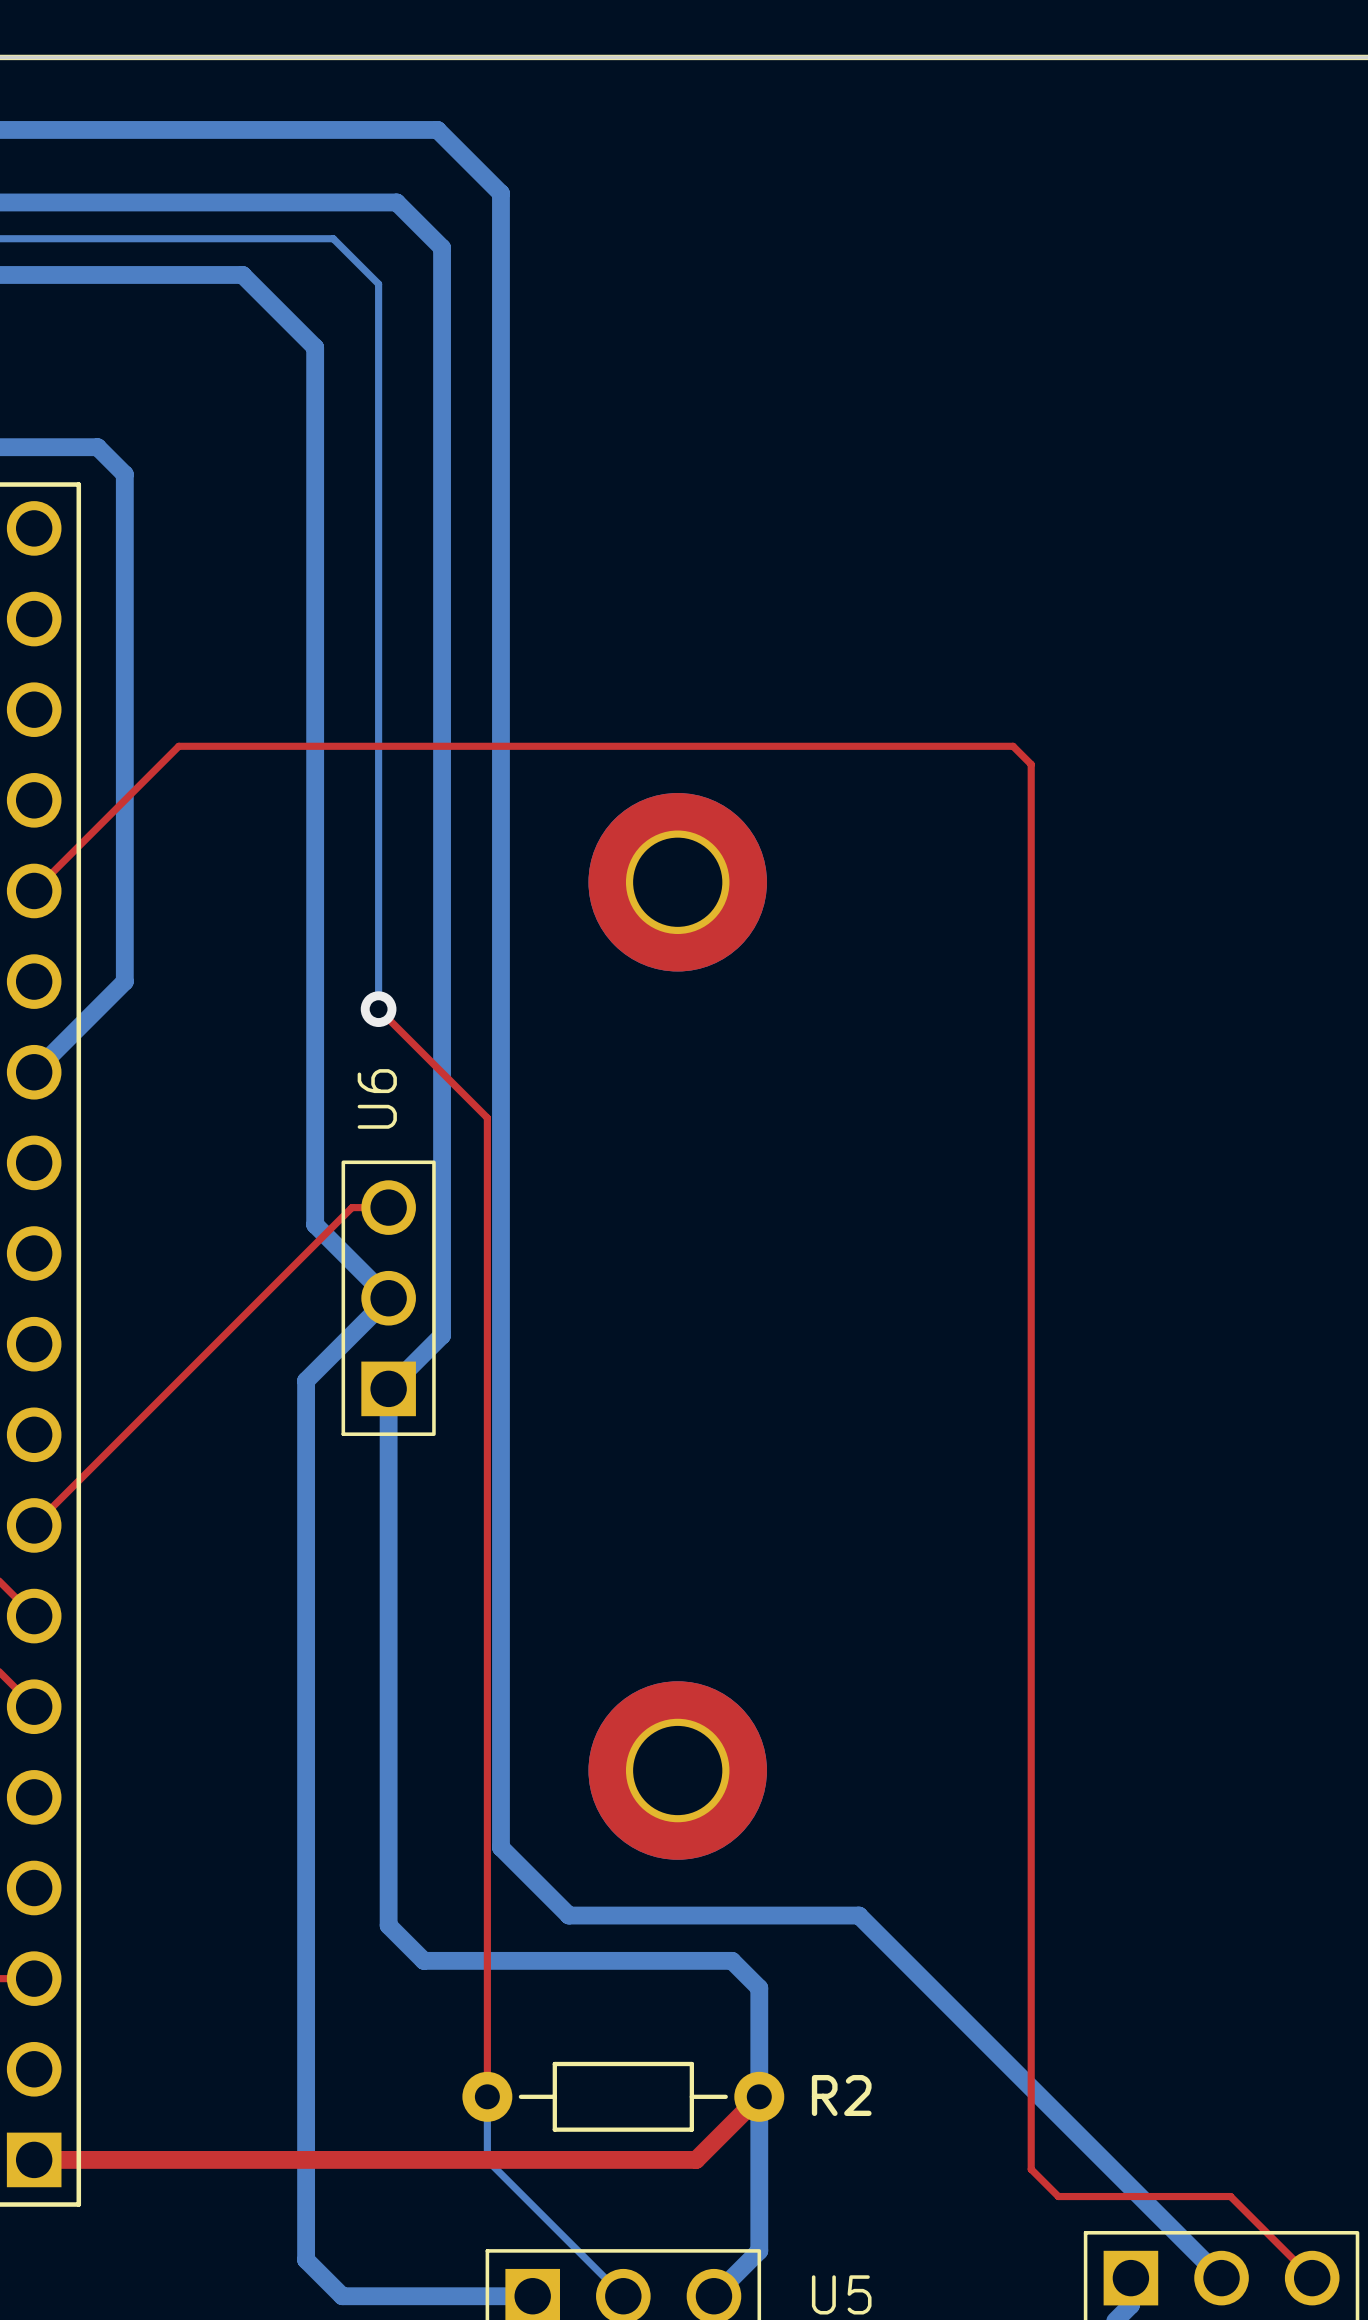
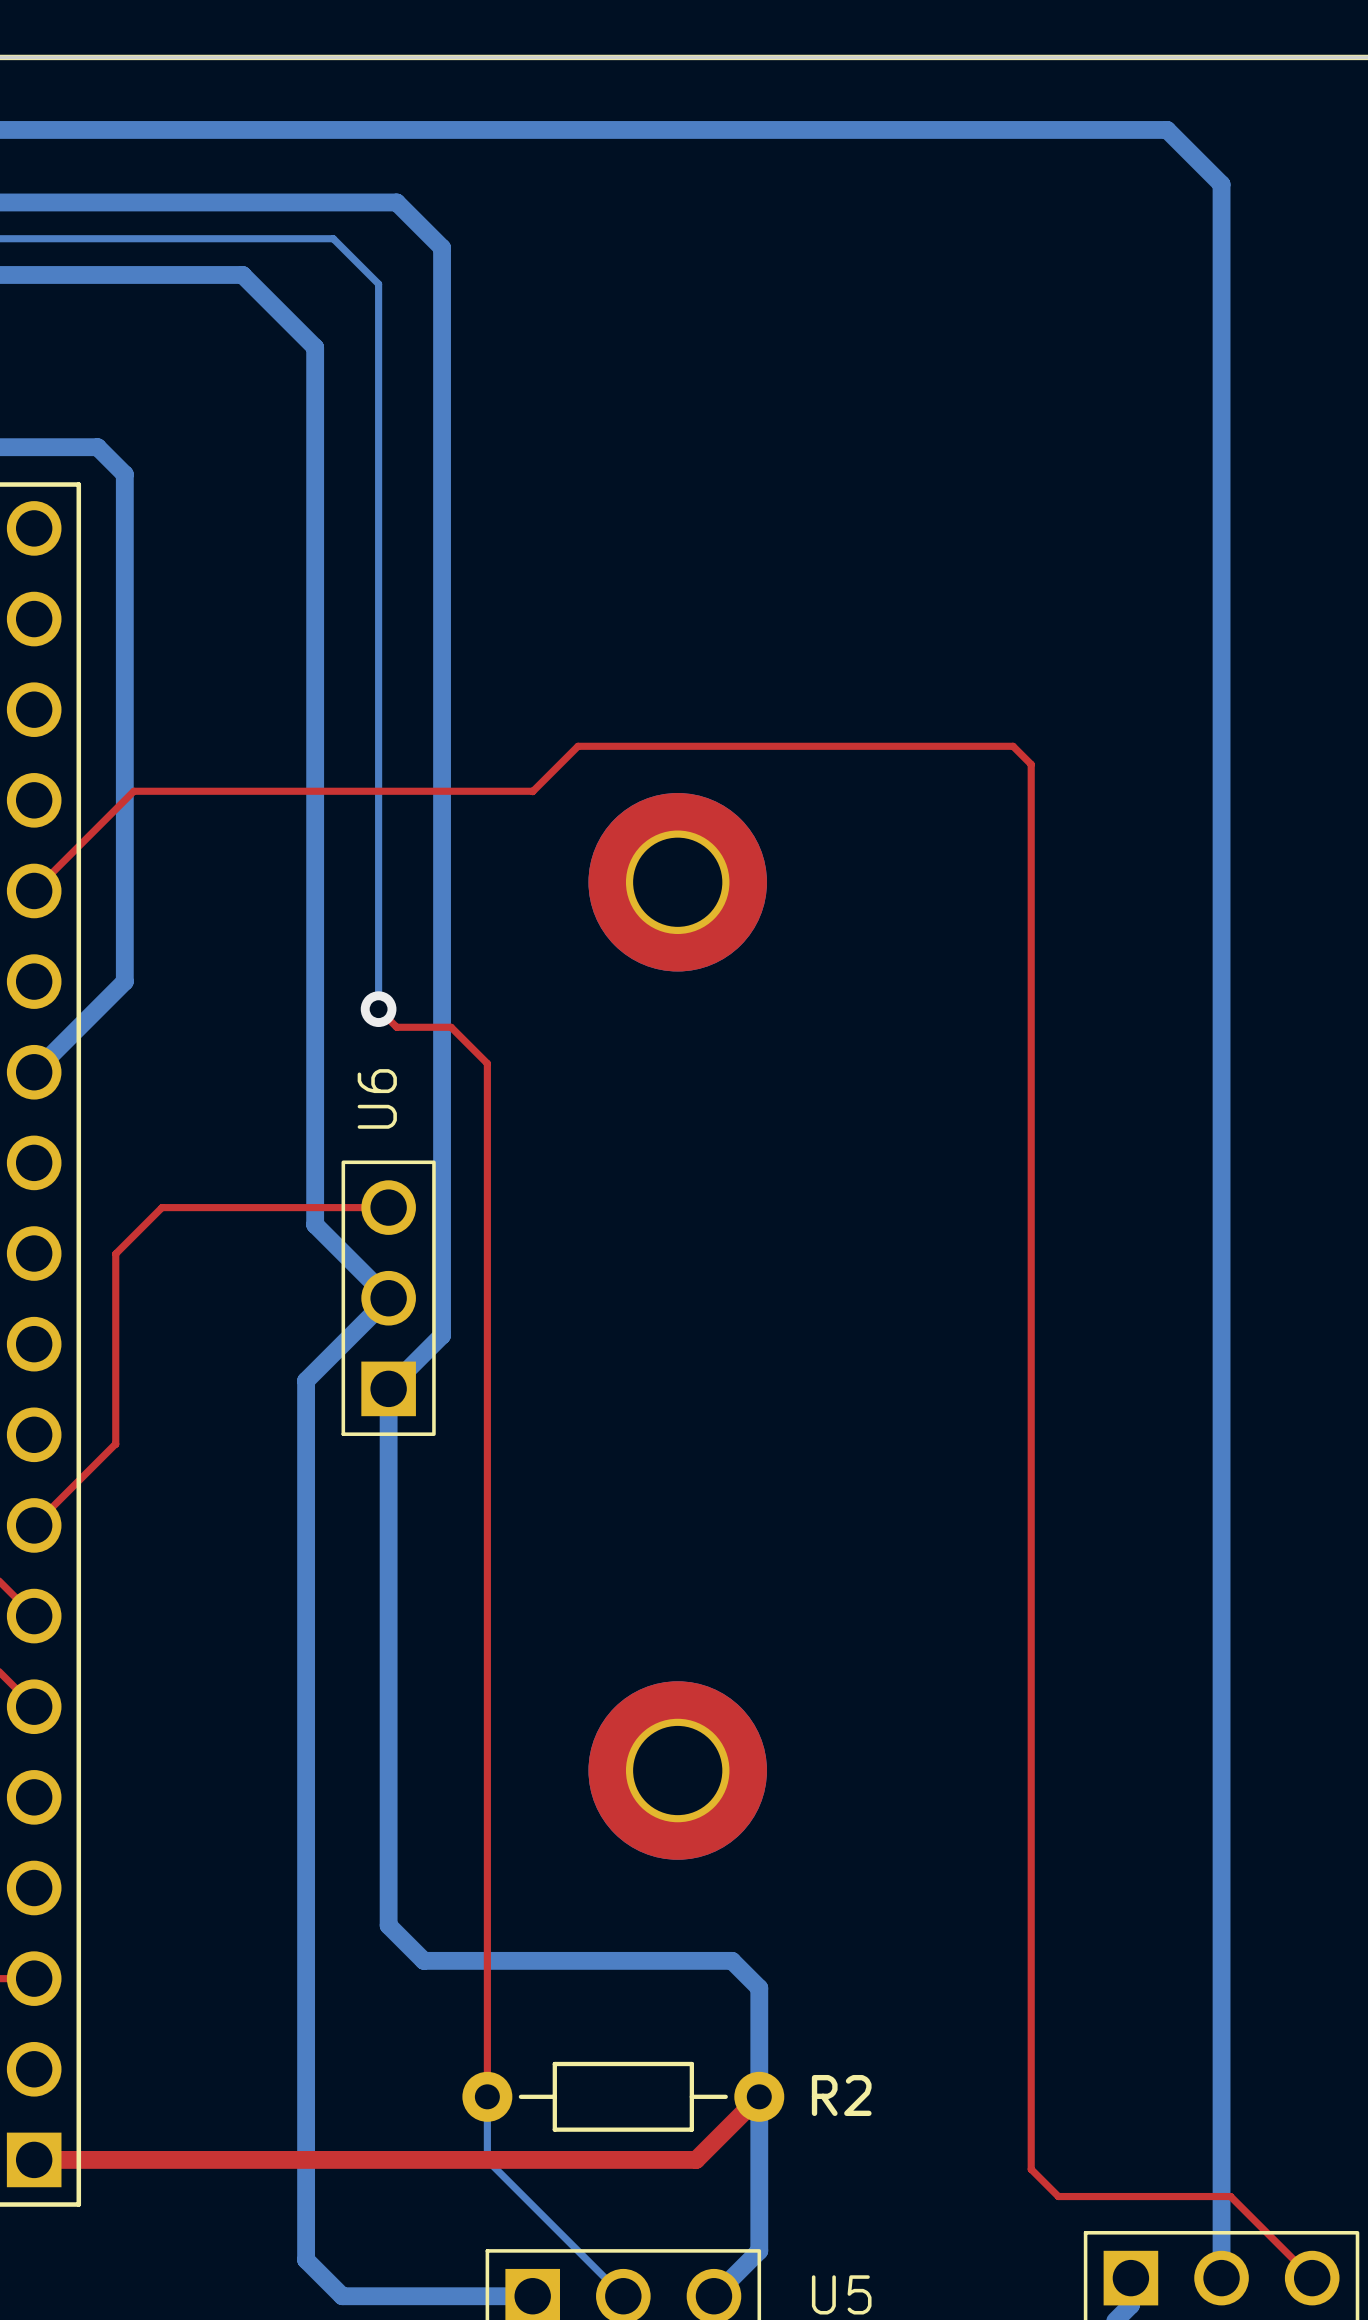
bottom track: (437, 129) (500, 193) (500, 1847) (568, 1915) (858, 1915) (1221, 2278) -> (437, 129) (1167, 129) (1221, 184) (1221, 2278)
top track: (578, 746) (178, 746) (133, 791) -> (532, 791) (133, 791)
top track: none -> (578, 746) (532, 791)
top track: (396, 1027) (487, 1117) -> (396, 1027) (451, 1027) (487, 1063) (487, 1117)
top track: (352, 1207) (115, 1444) -> (352, 1207) (162, 1207) (115, 1253) (115, 1444)

